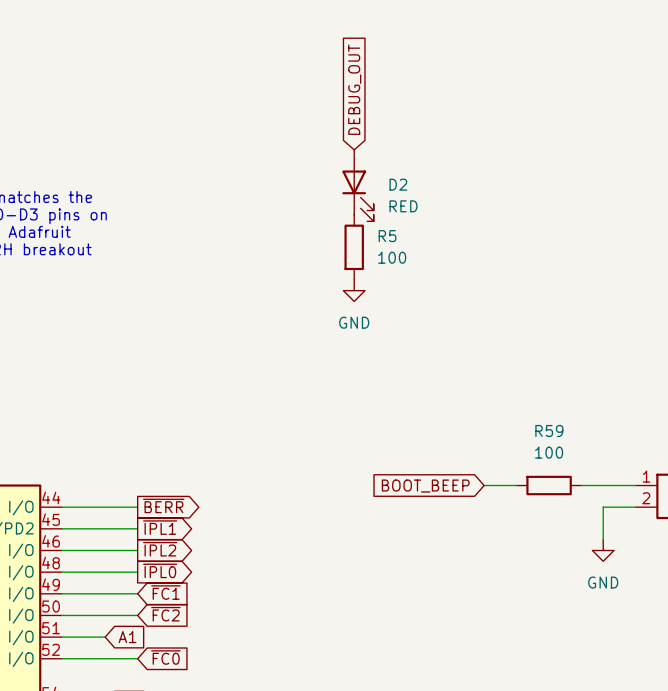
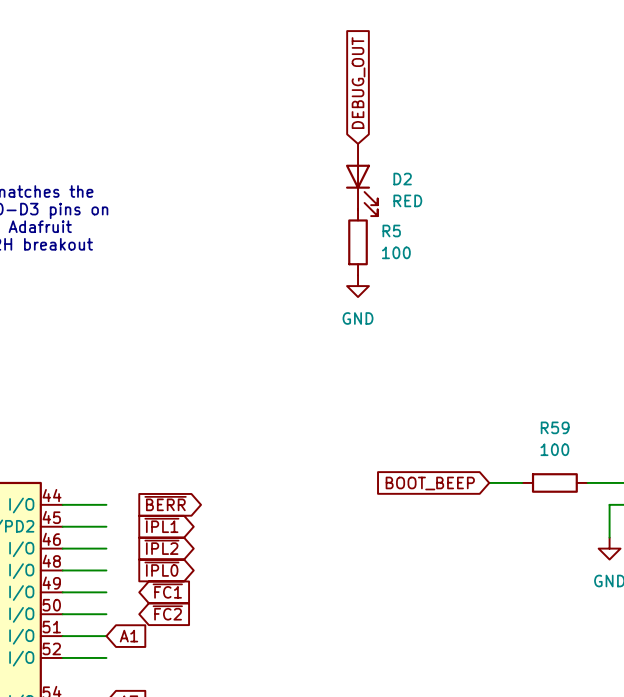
wire: (105, 507) (137, 507) -> none
wire: (105, 528) (137, 528) -> none
wire: (105, 550) (137, 550) -> none
wire: (105, 572) (137, 572) -> none
wire: (105, 593) (137, 593) -> none
wire: (105, 615) (137, 615) -> none
global label: ~{FC0} (165, 657) -> none
wire: (105, 658) (137, 658) -> none

